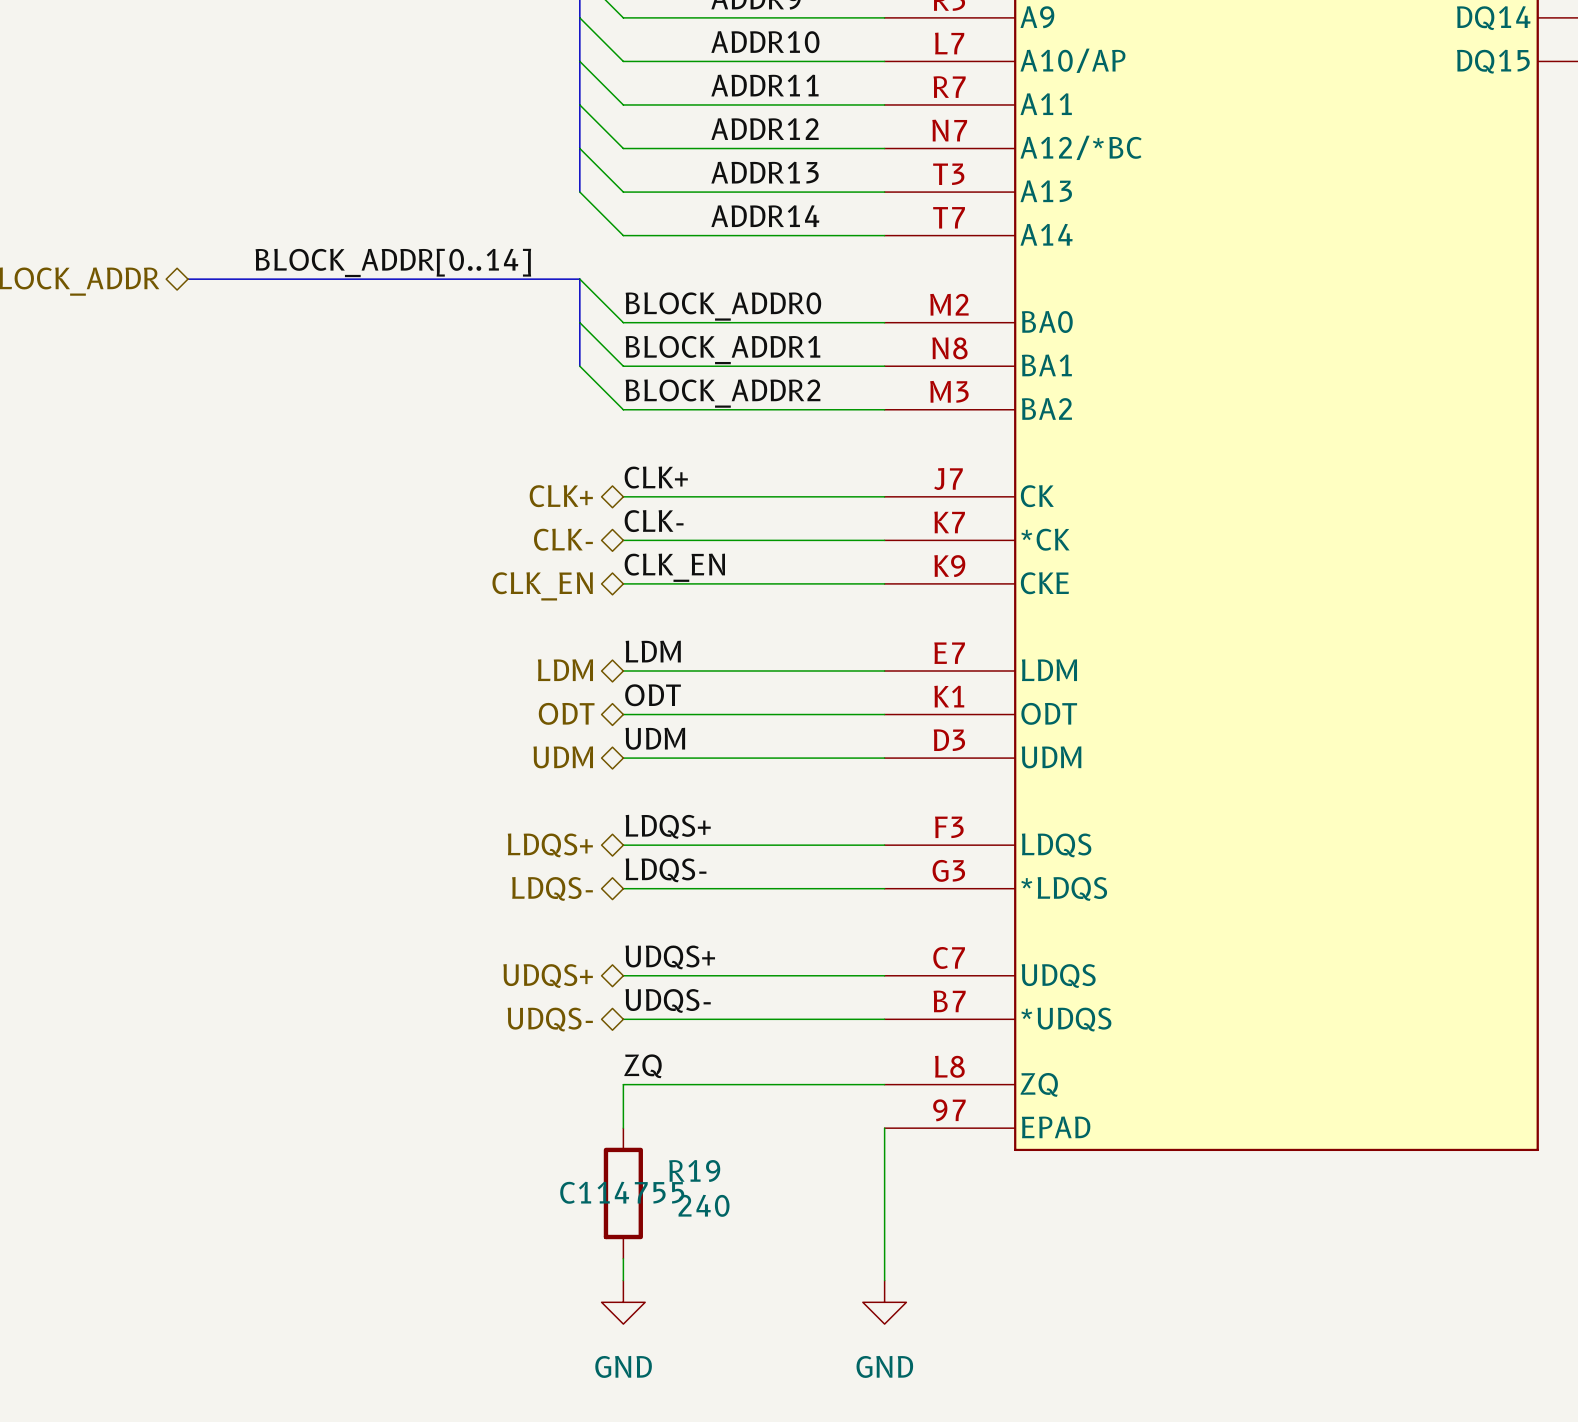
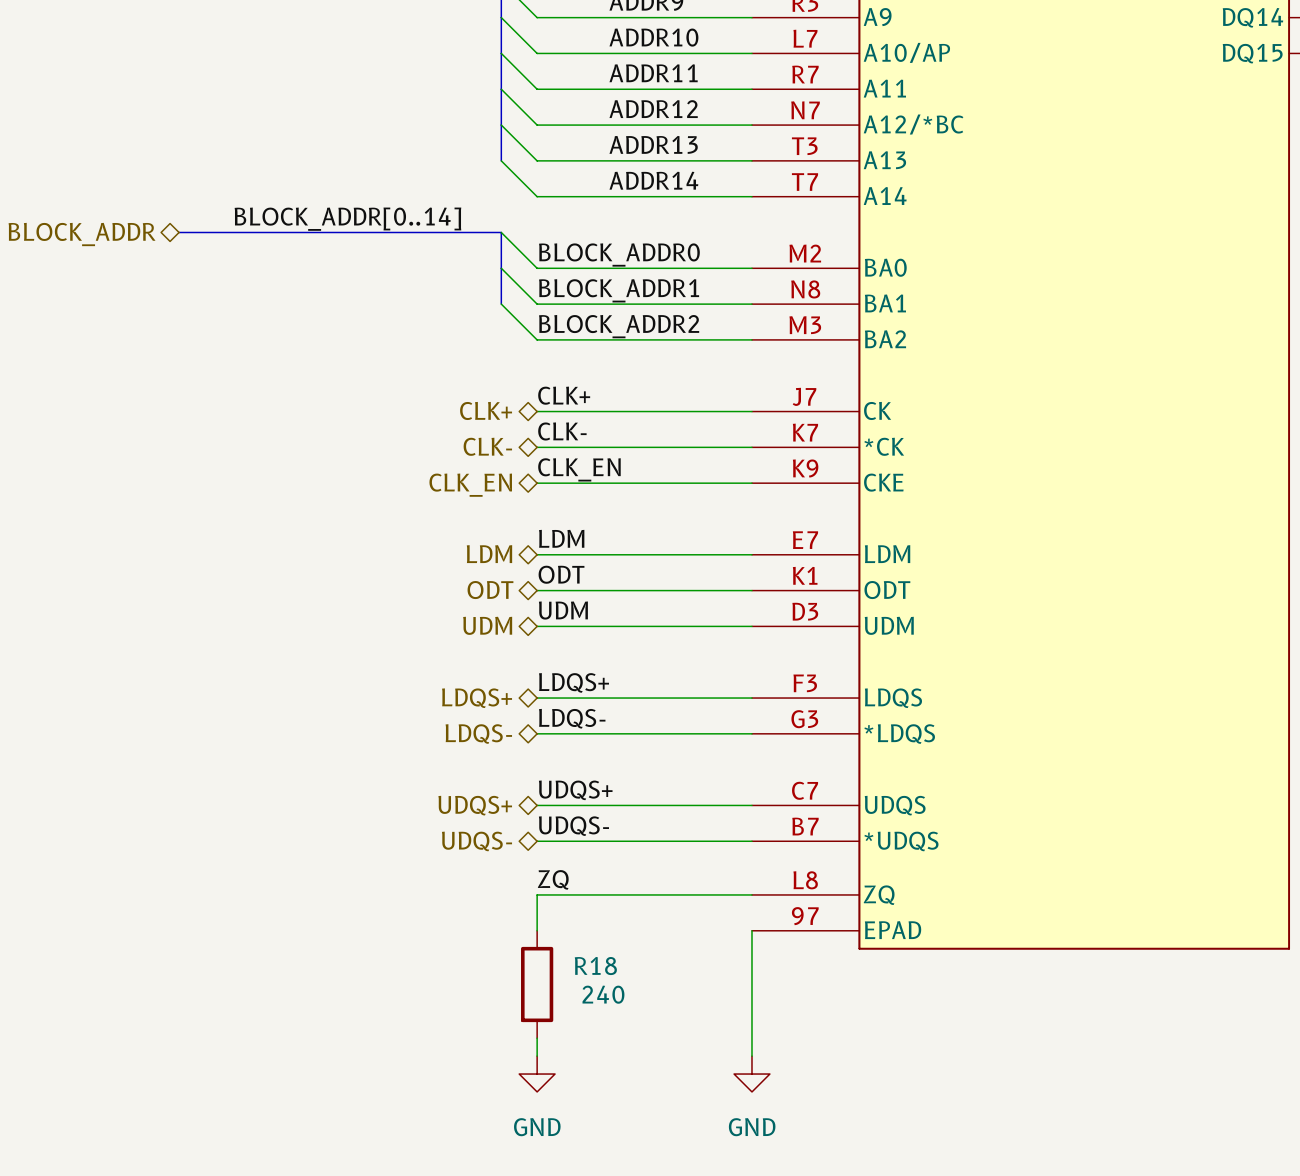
R19 name: R19 (694, 1171) -> R18 (595, 966)
R19 text: C114755 (622, 1192) -> none

